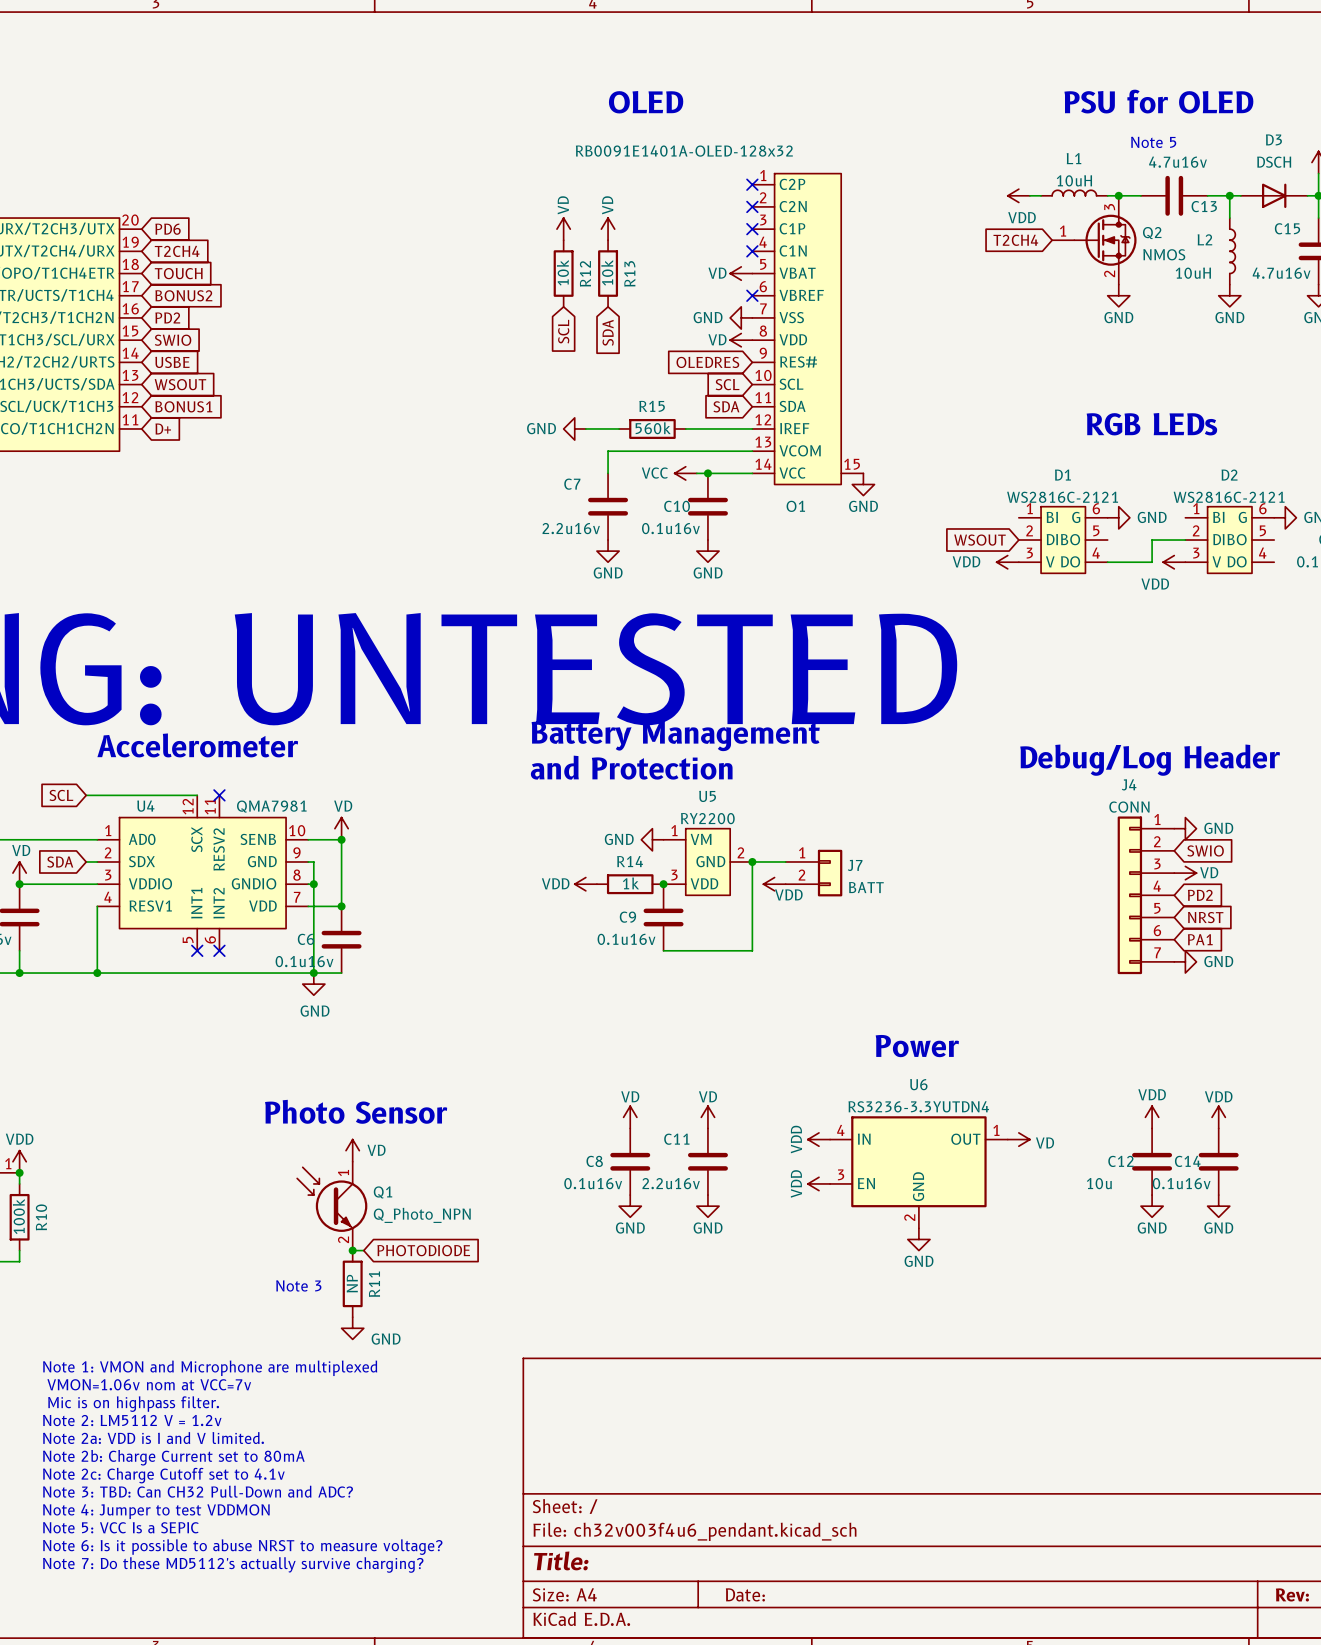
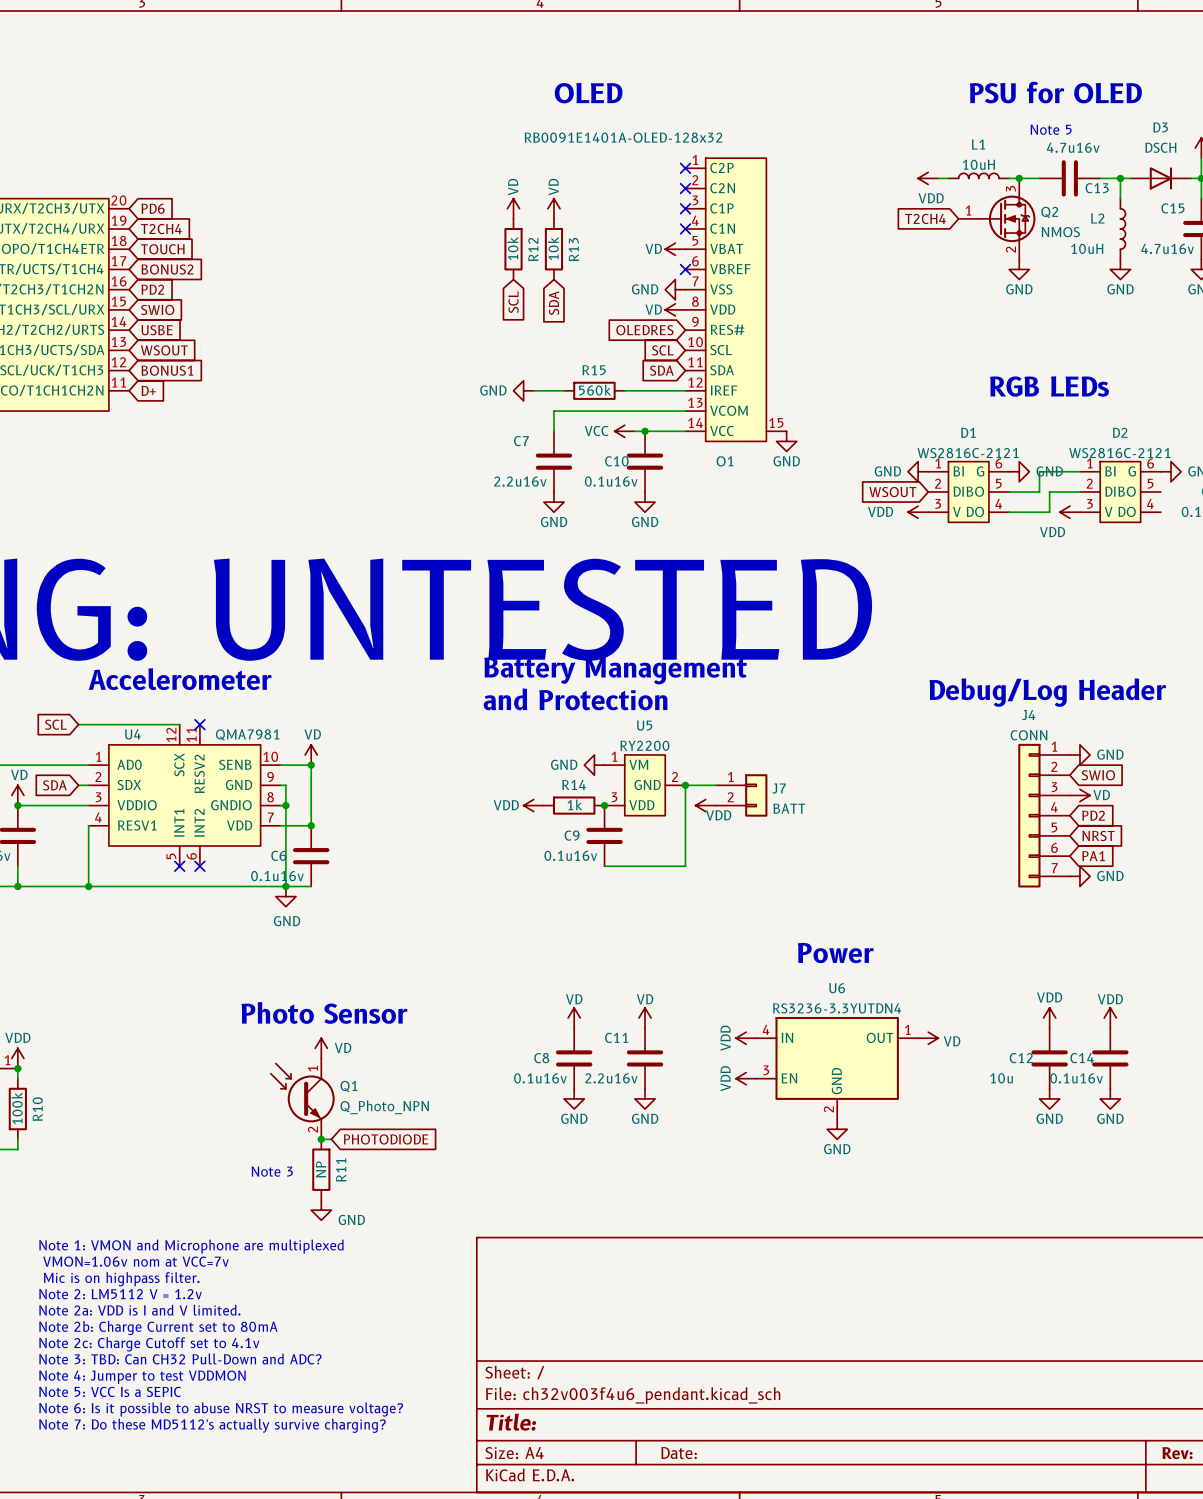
power symbol: none -> GND (918, 471)
wire: none -> (1079, 471) (1039, 471) (1039, 491) (1009, 491)

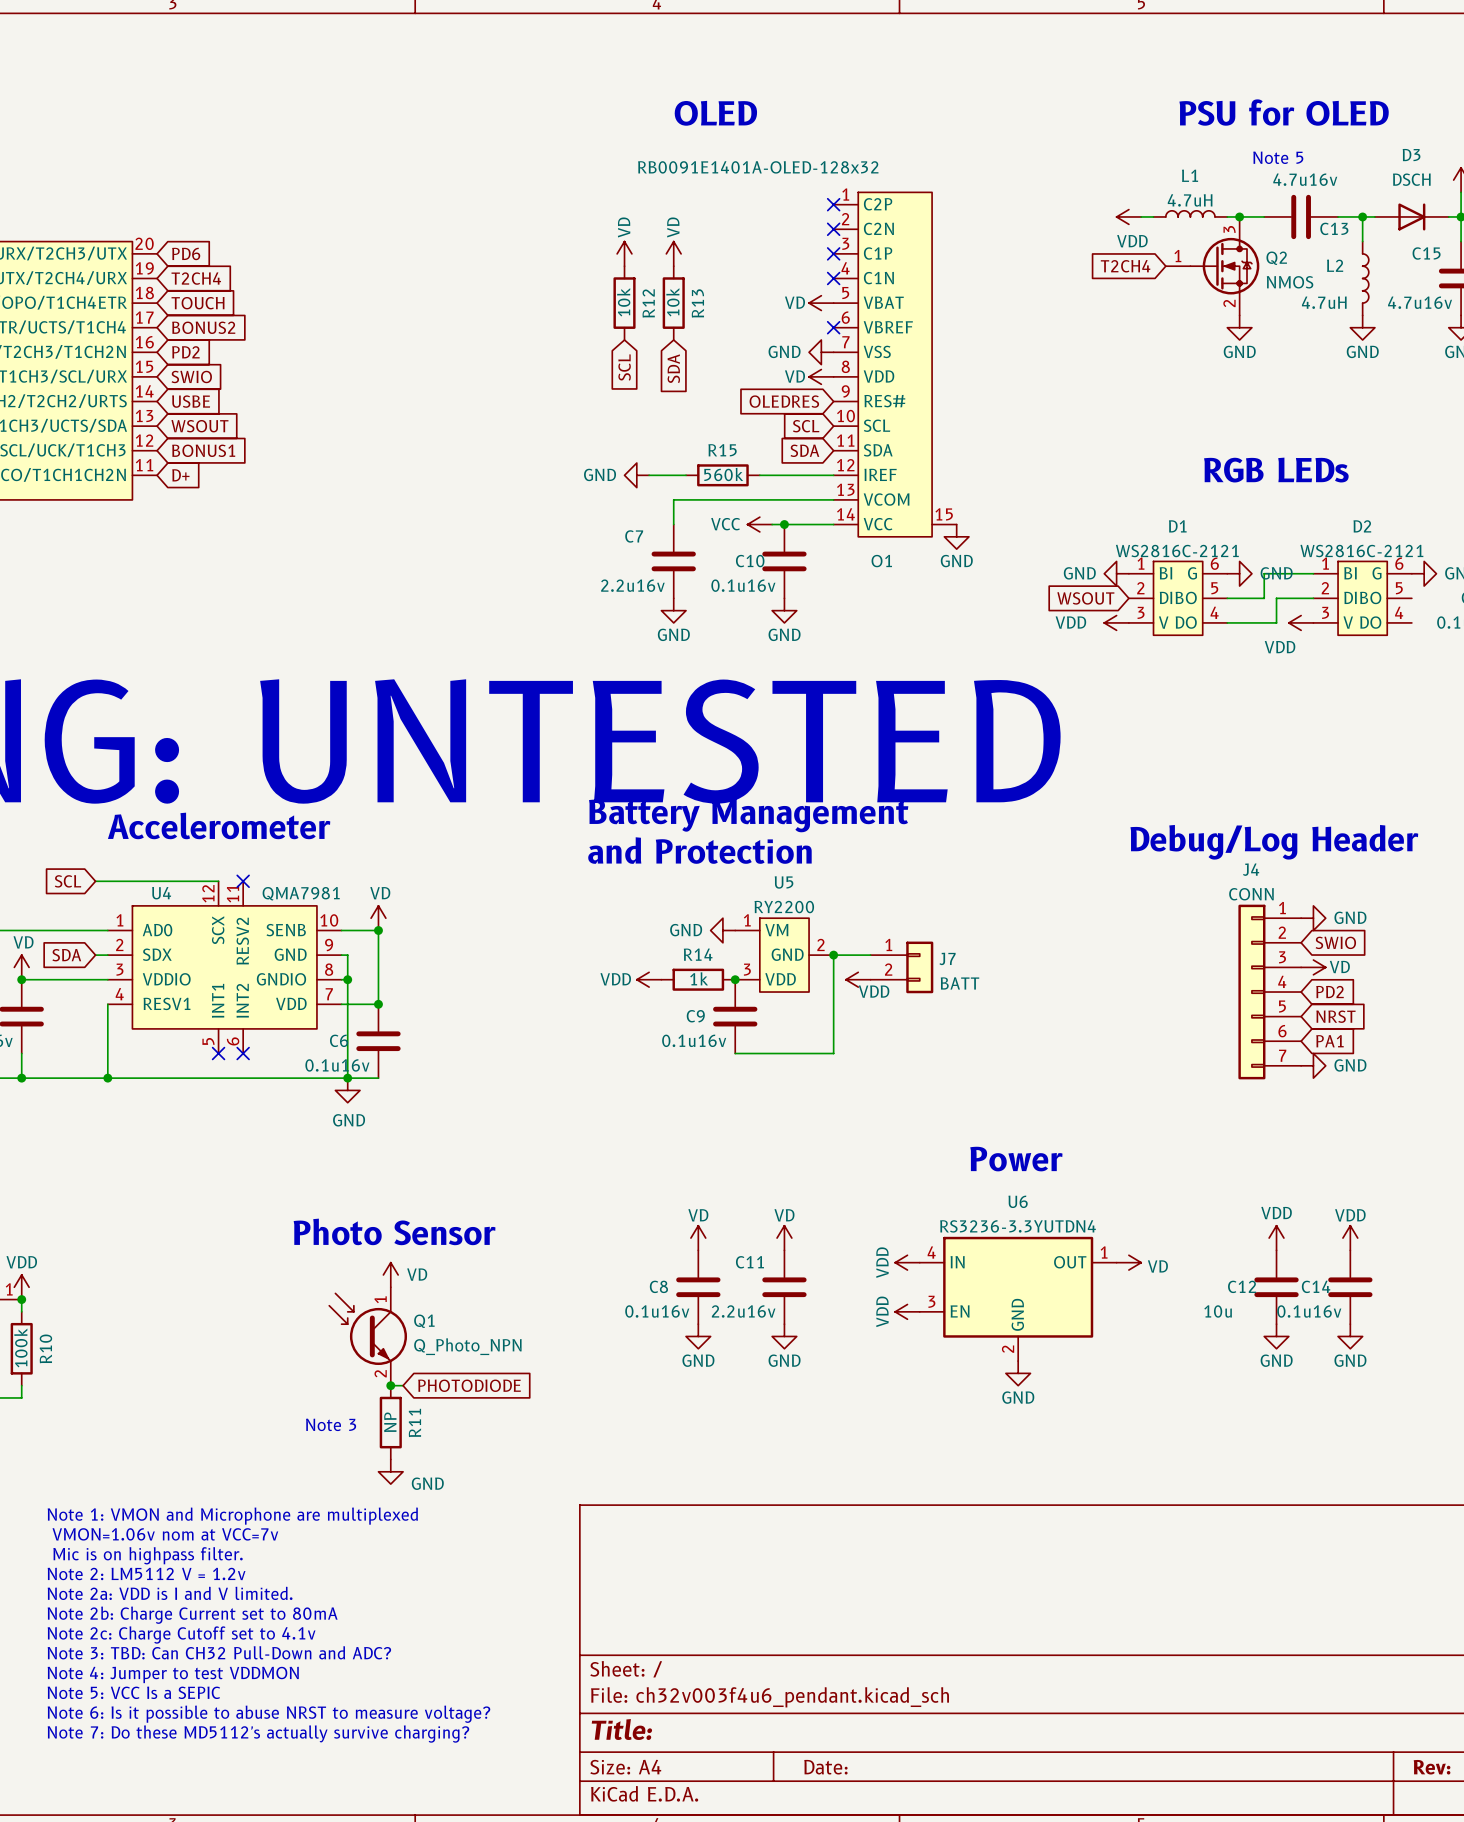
L1 value: 10uH (978, 164) -> 4.7uH (1190, 200)
L2 value: 10uH (1087, 248) -> 4.7uH (1324, 302)

